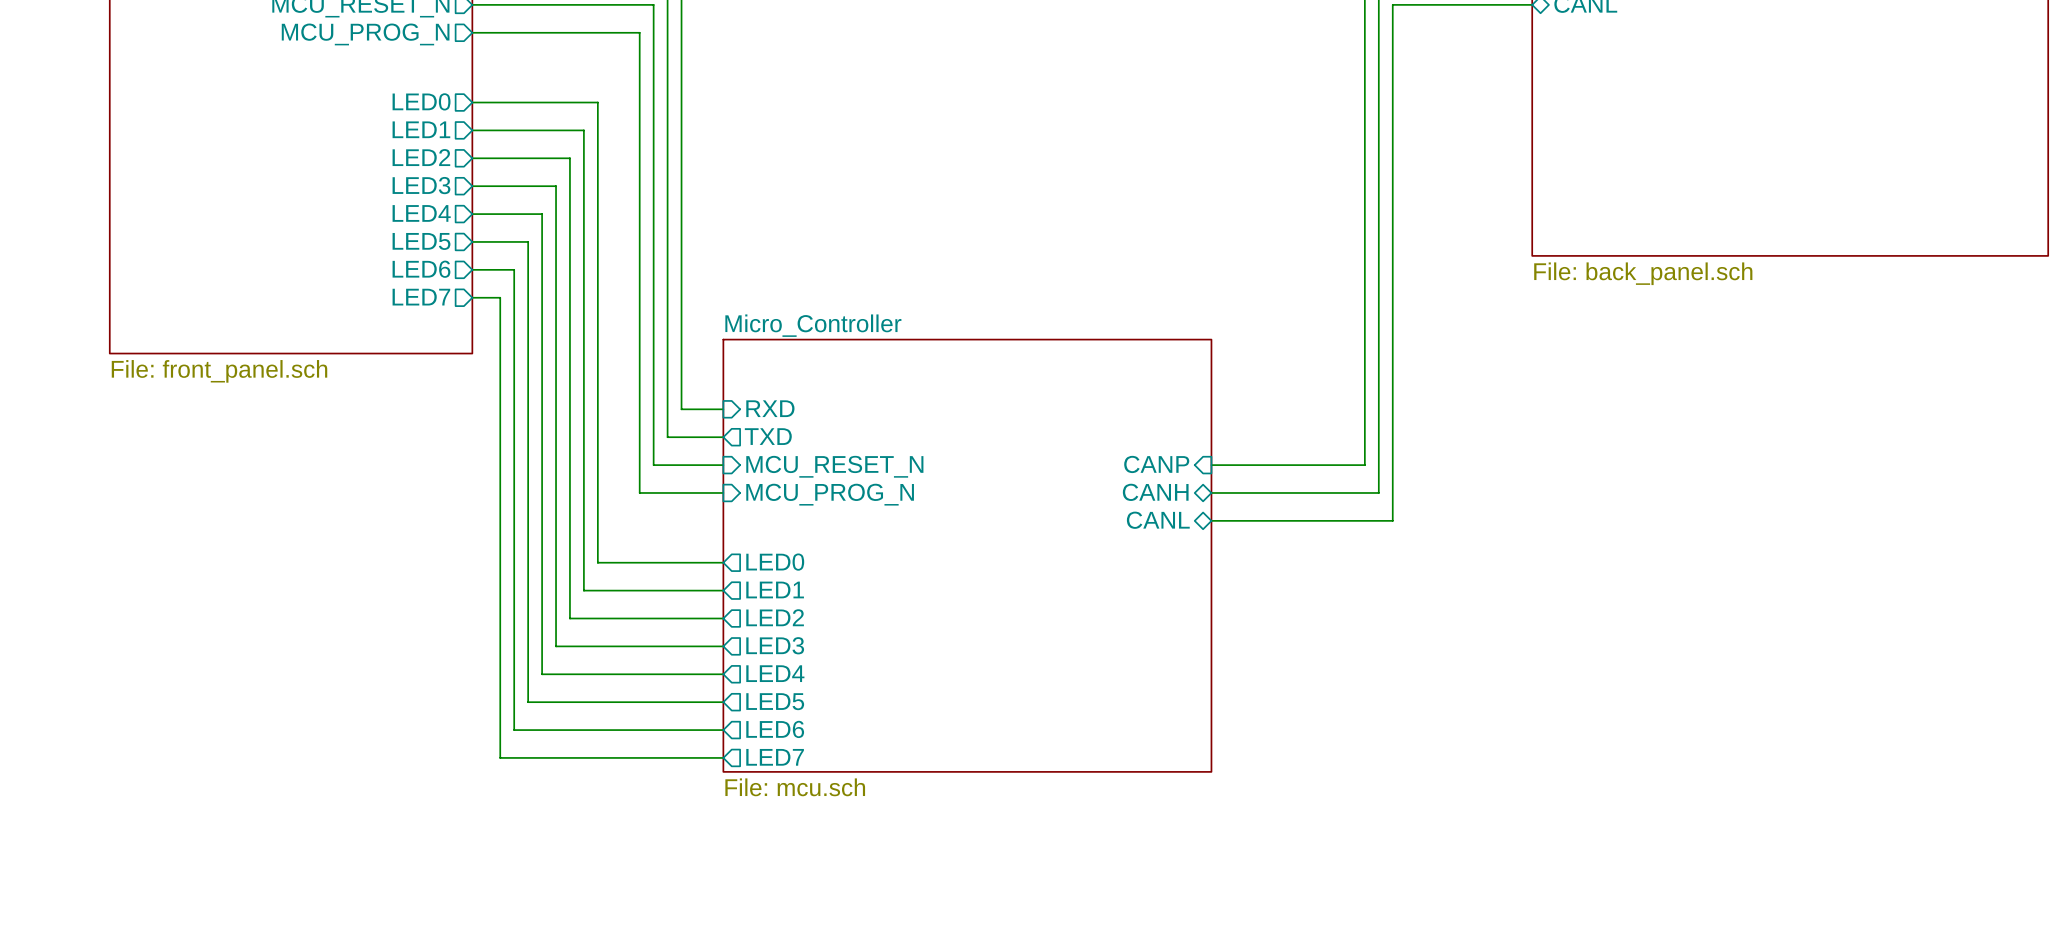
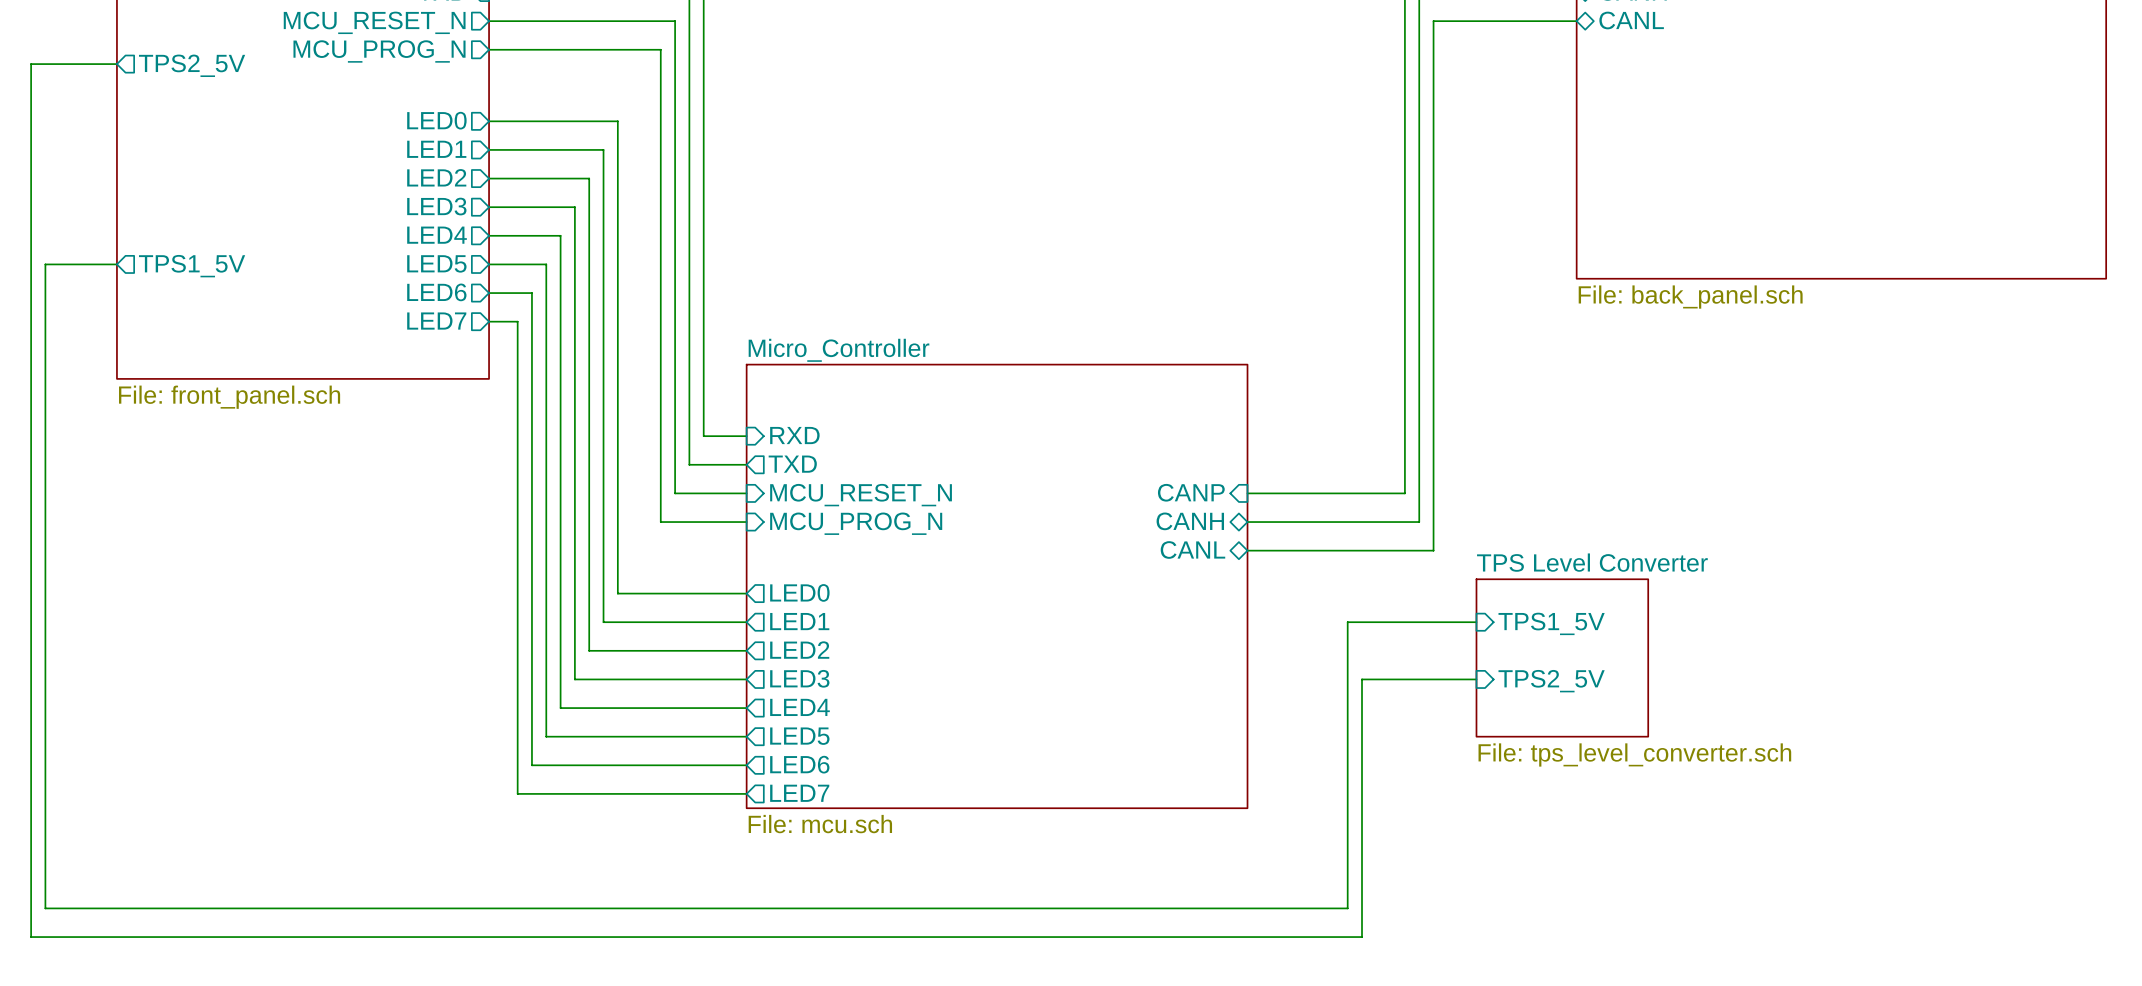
wire: none -> (116, 64) (31, 64) (31, 937) (1362, 937) (1362, 679) (1476, 679)
sheet pin: none -> TPS2_5V (192, 65)
wire: none -> (116, 264) (45, 264) (45, 908) (1347, 908) (1347, 622) (1476, 622)
sheet pin: none -> TPS1_5V (192, 266)
sheet pin: none -> TPS1_5V (1551, 623)
sheet TPS Level Converter: none -> File: tps_level_converter.sch (1562, 657)
sheet pin: none -> TPS2_5V (1551, 681)

